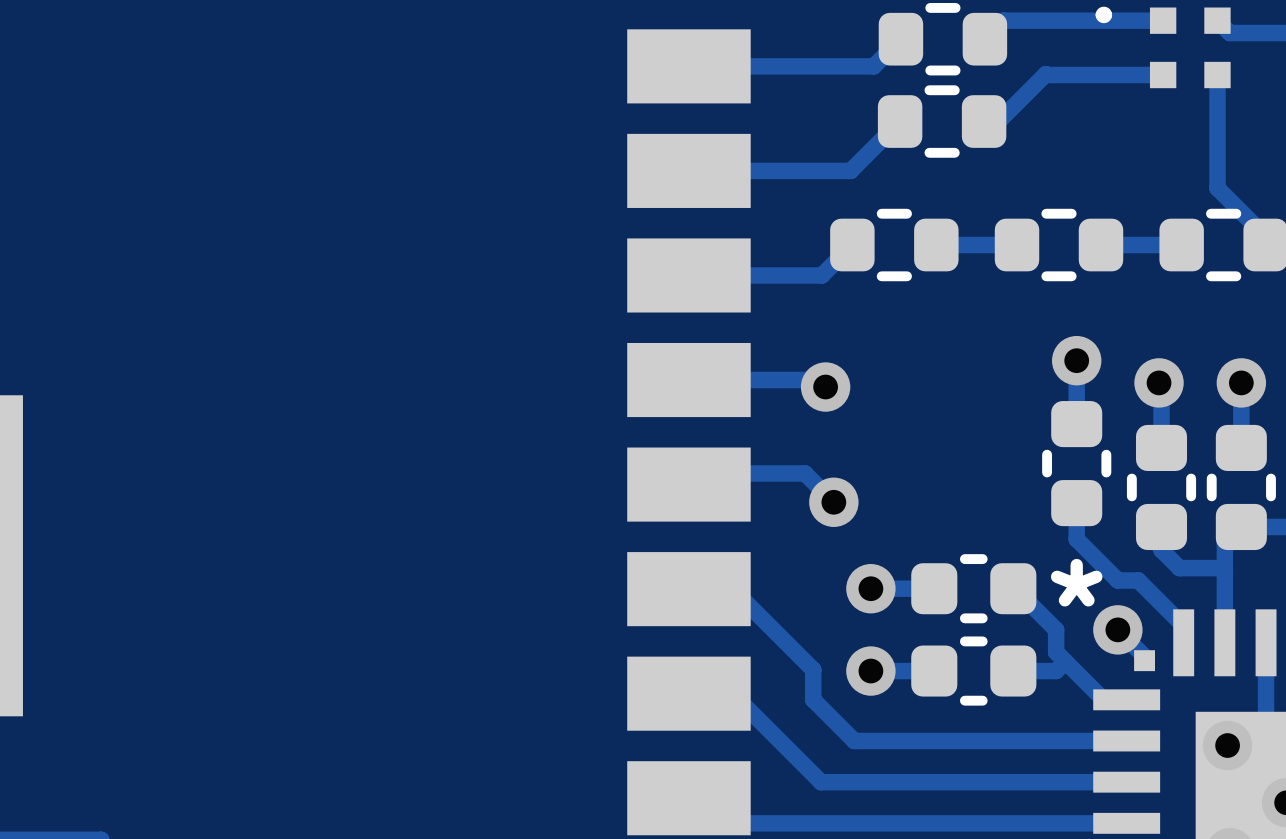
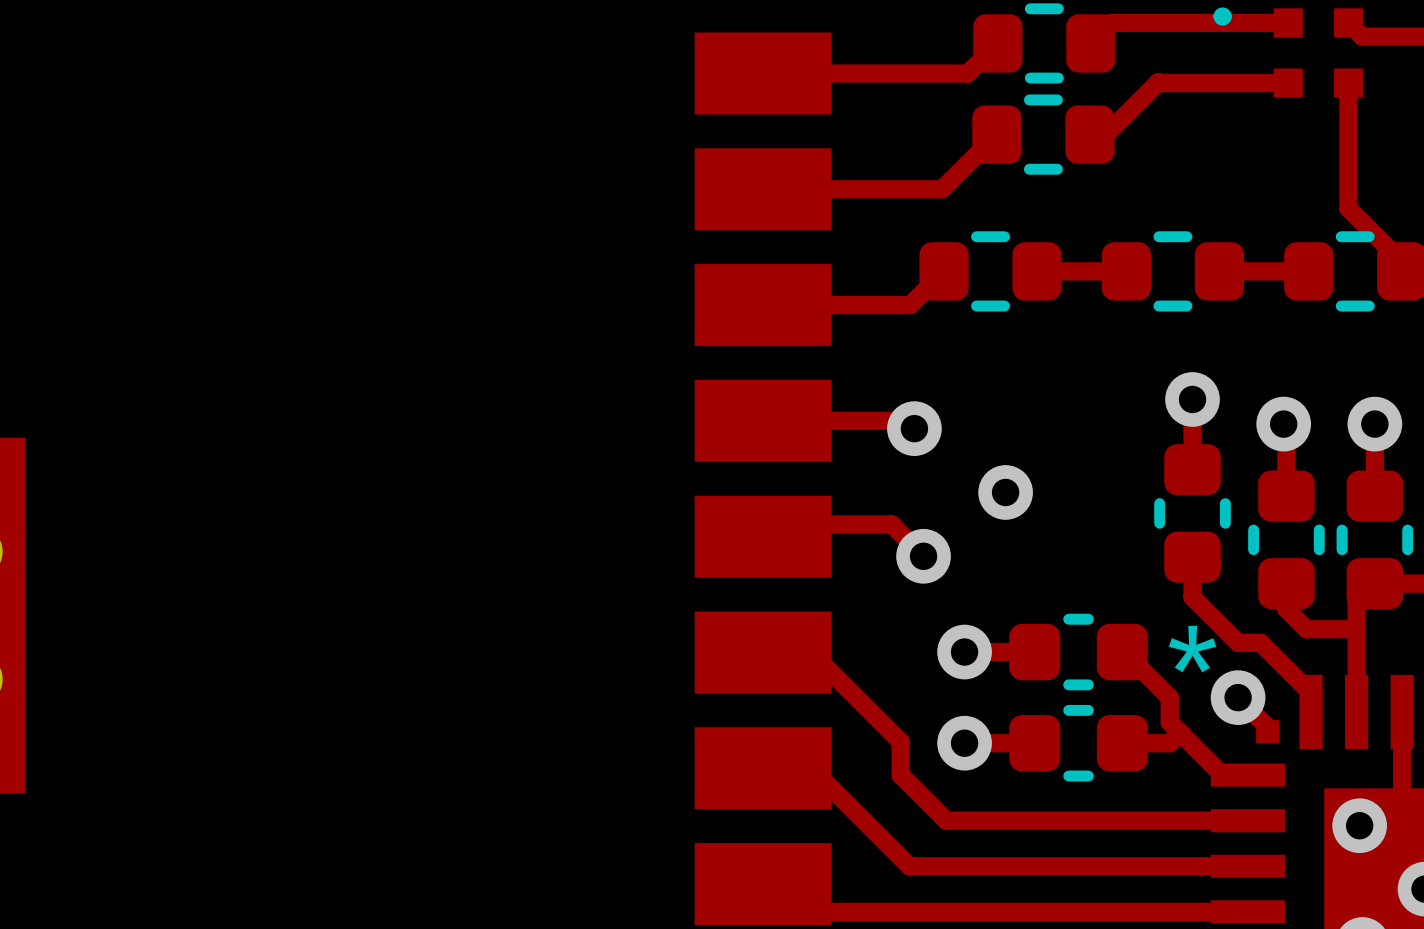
via: none -> (1005, 492)

